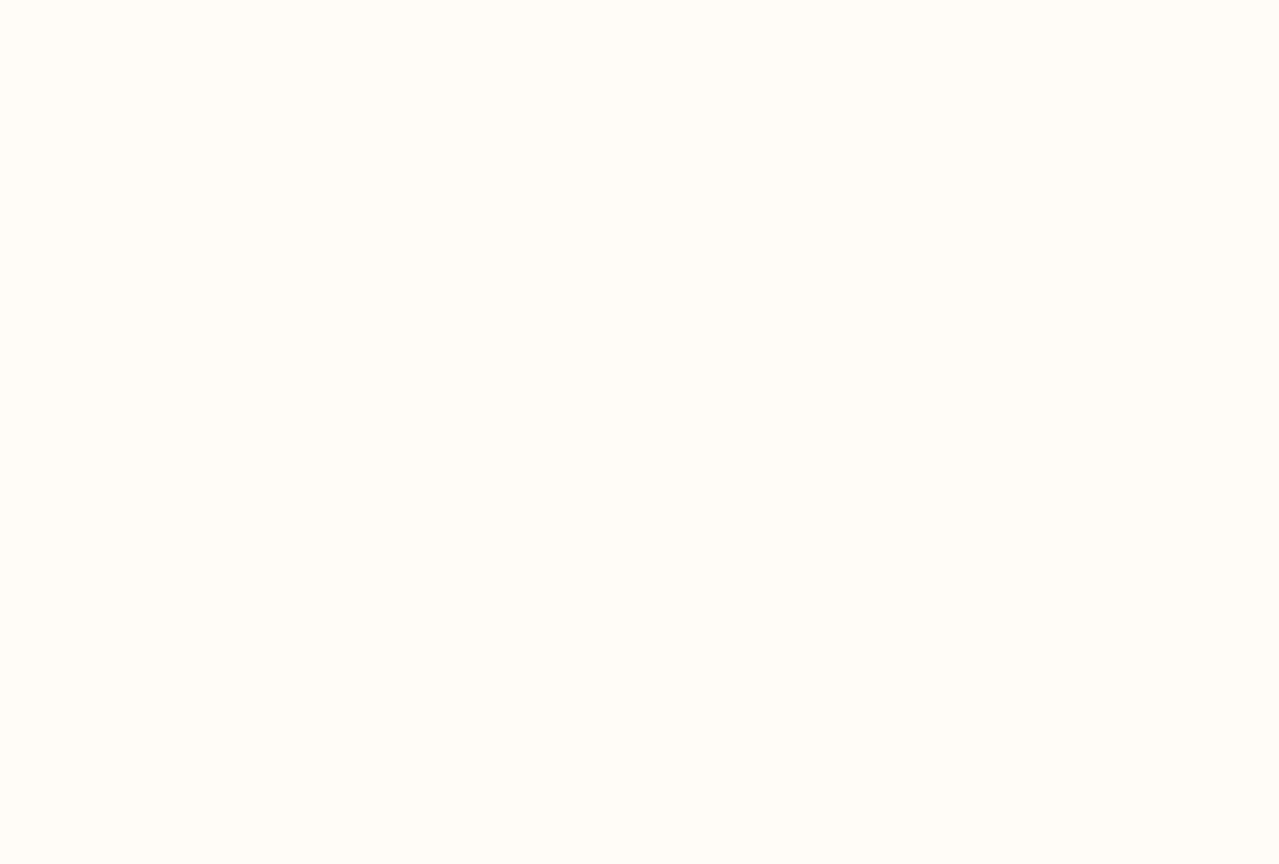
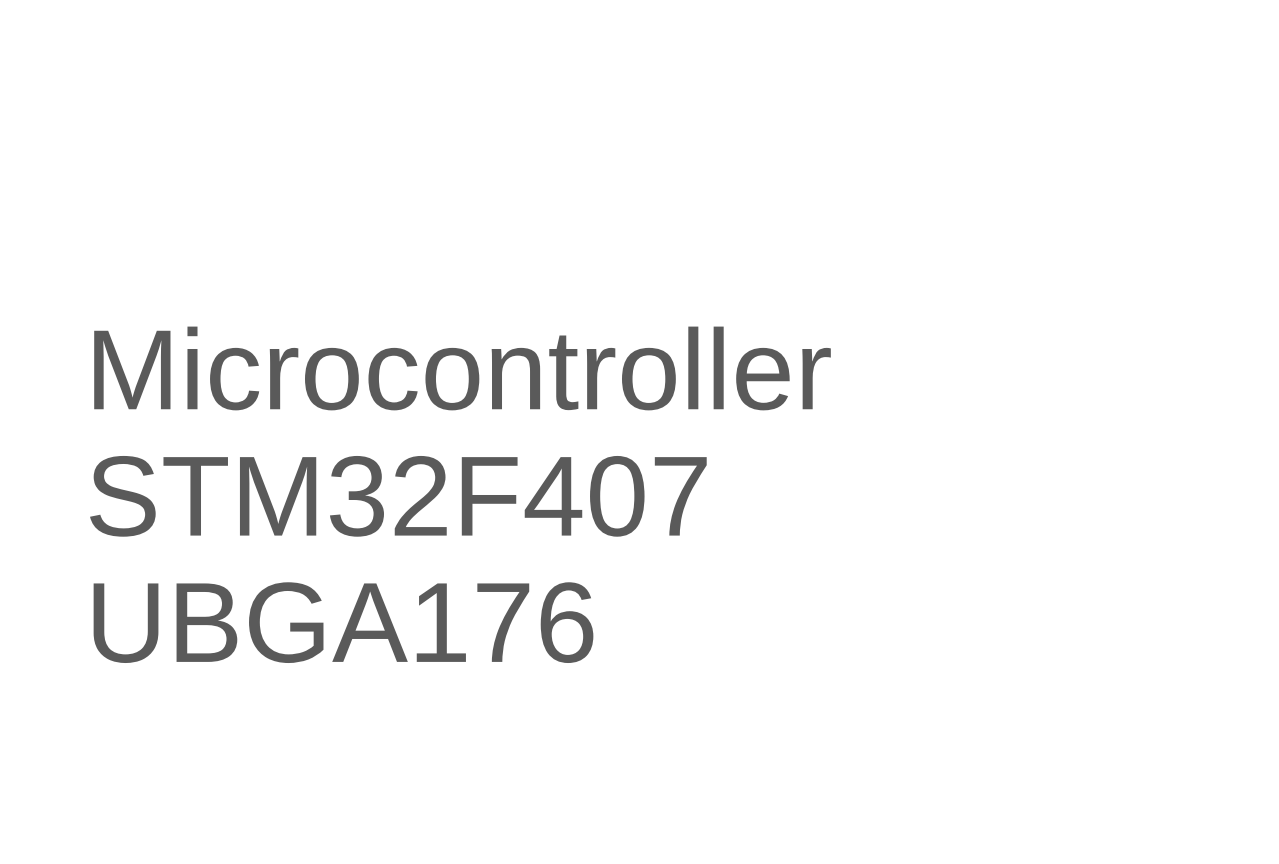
text: none -> Microcontroller (462, 368)
text: none -> STM32F407 (398, 496)
text: none -> UBGA176 (343, 622)

